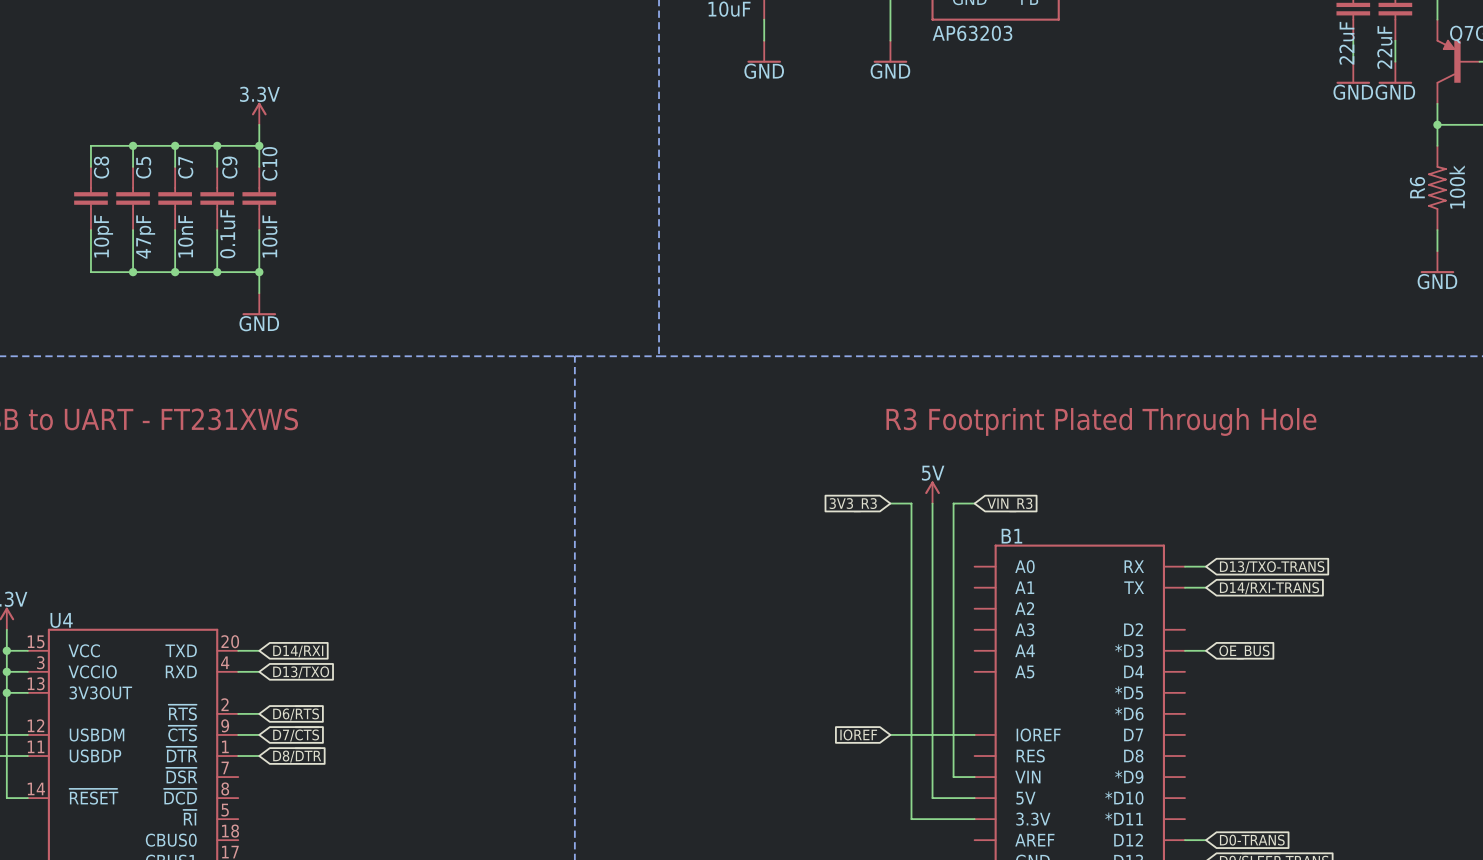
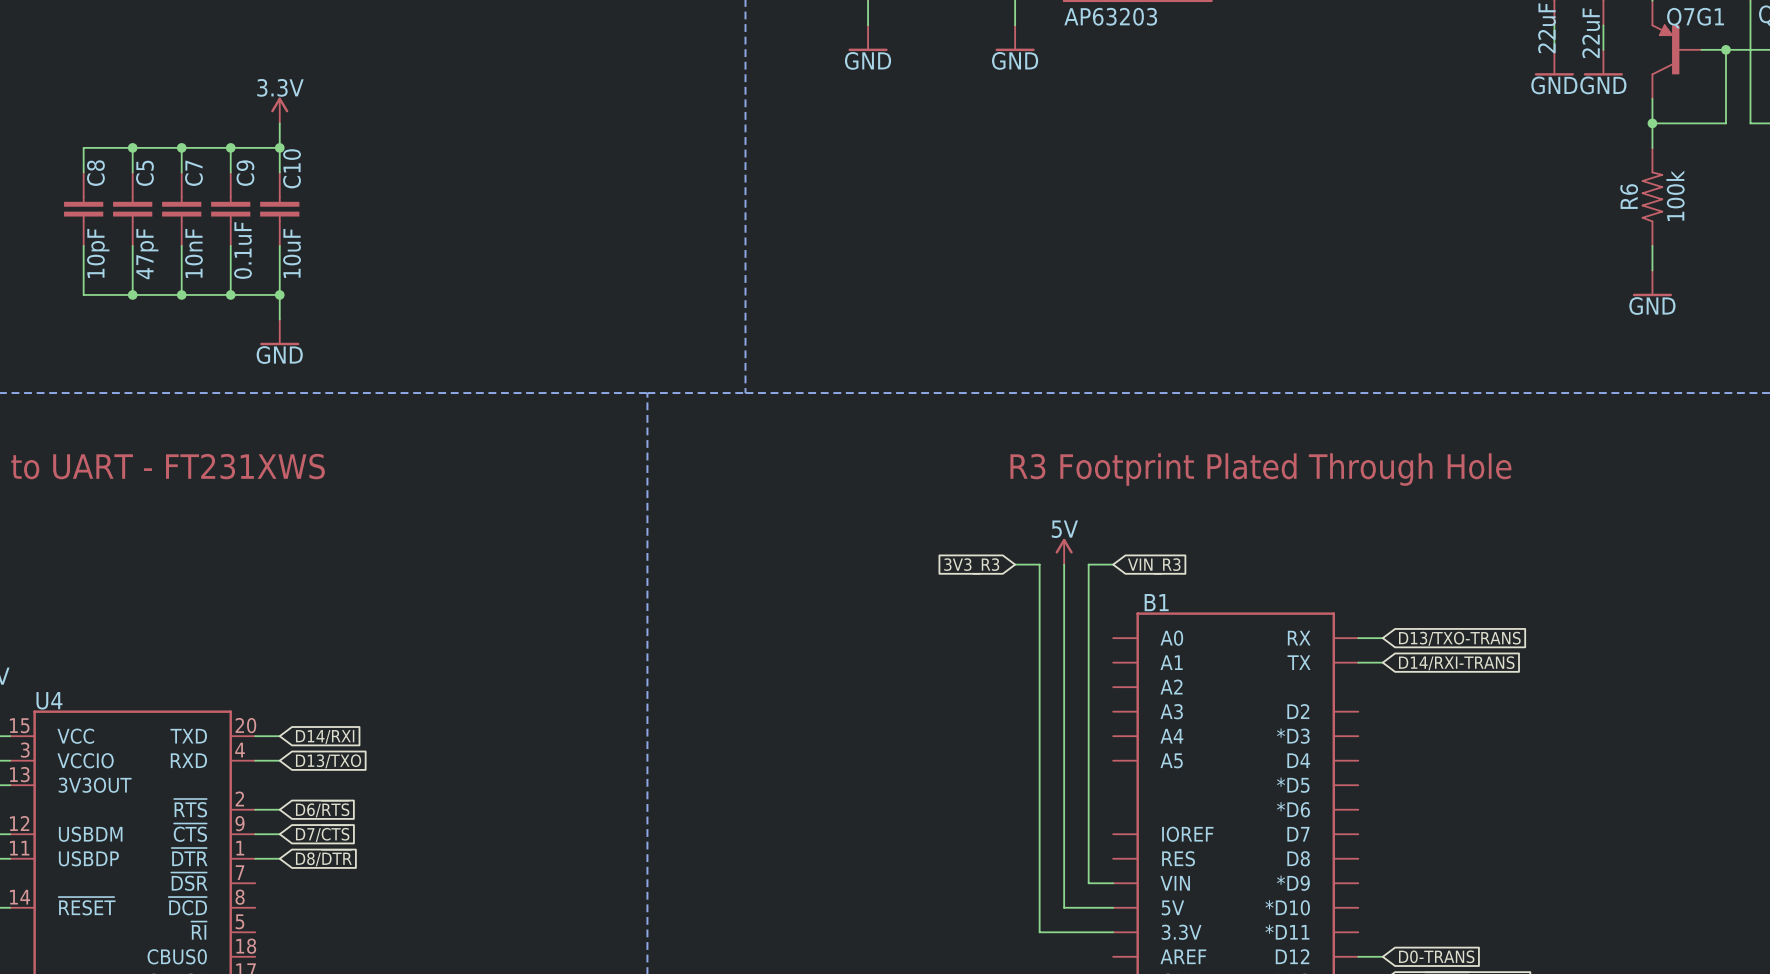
wire: (1184, 650) (1206, 650) -> none
global label: OE_BUS (1244, 652) -> none
global label: IOREF (858, 734) -> none
wire: (890, 734) (974, 734) -> none

